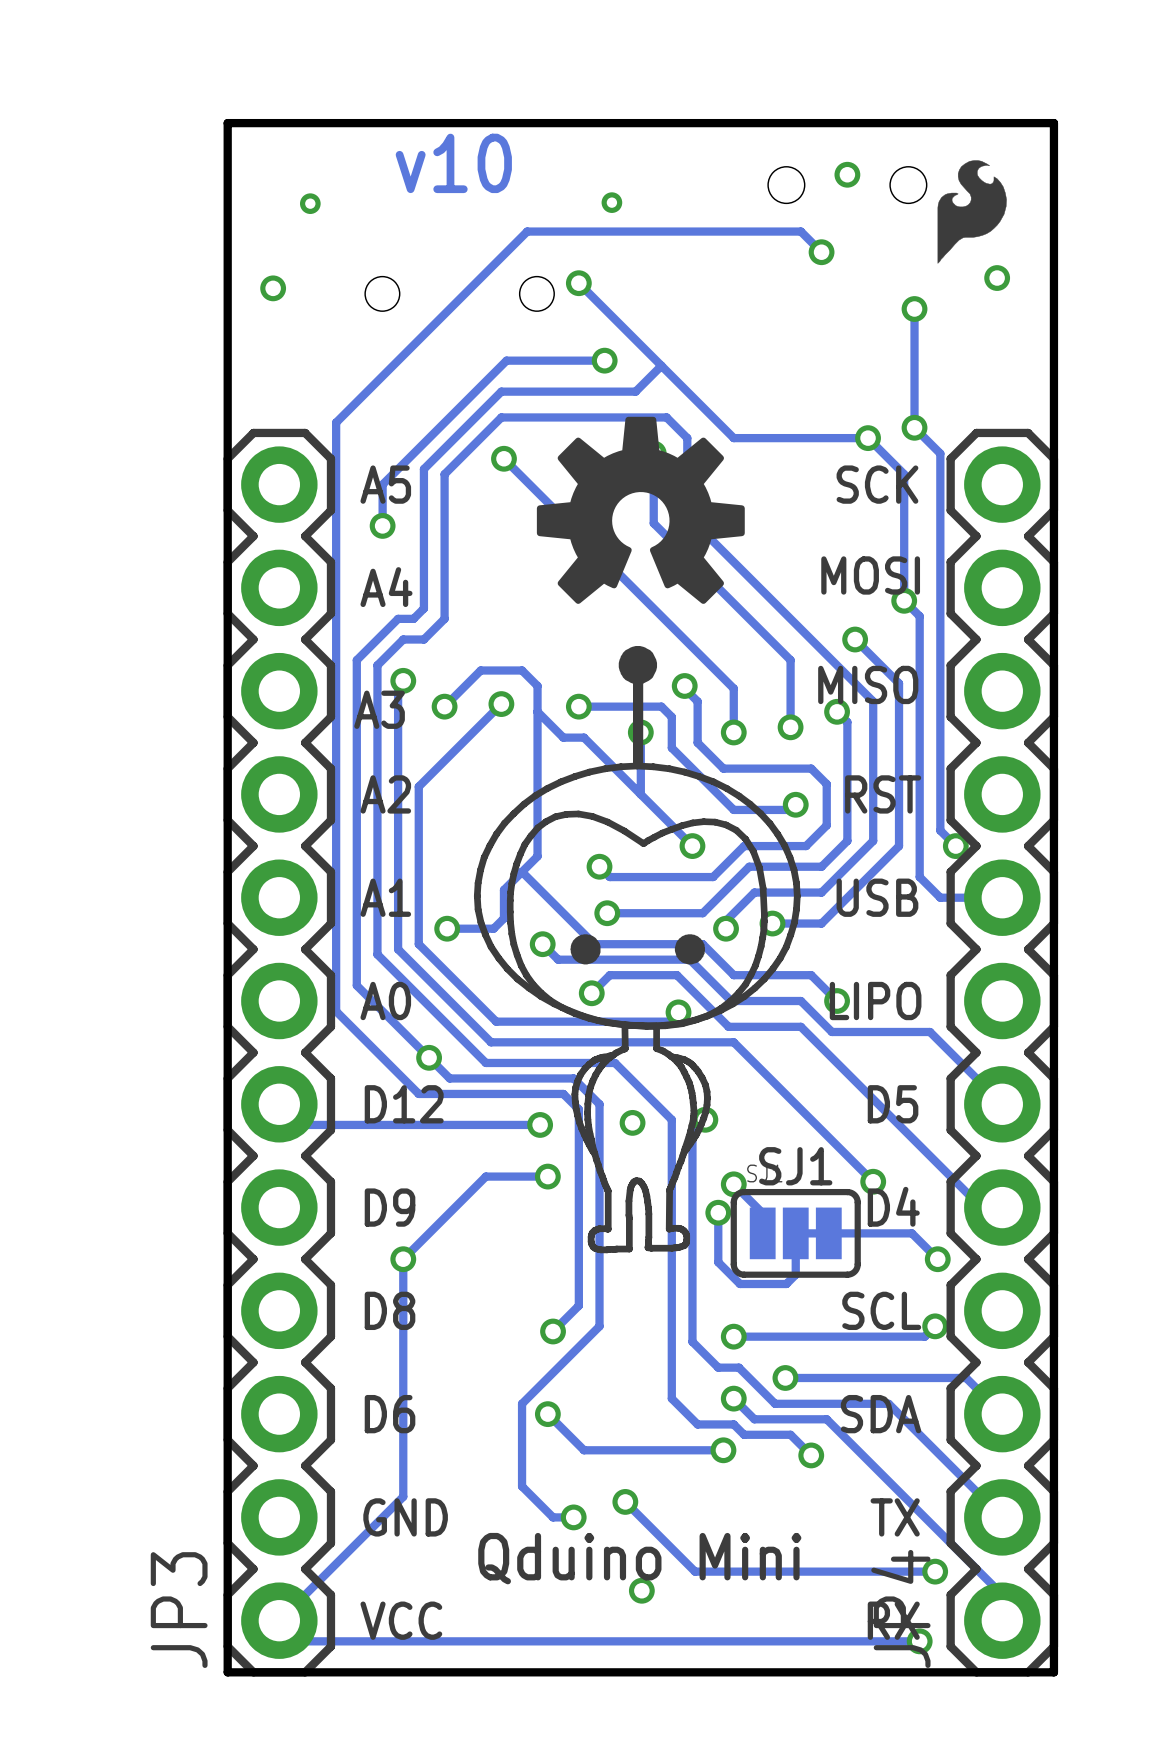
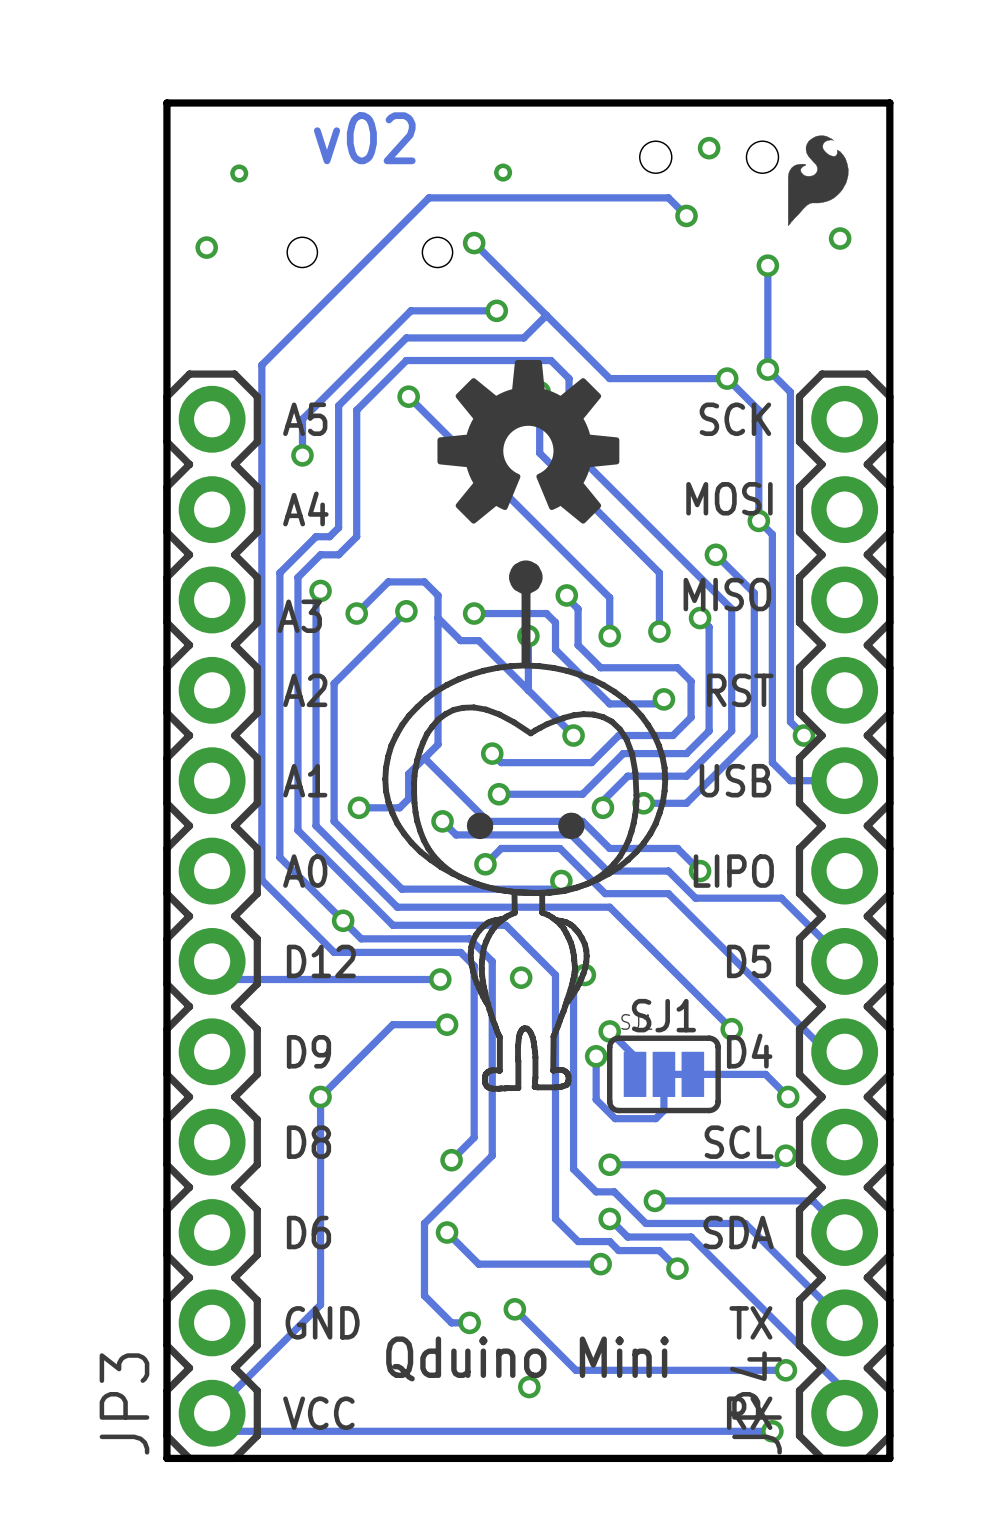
text: v10 (453, 163) -> v02 (364, 138)

